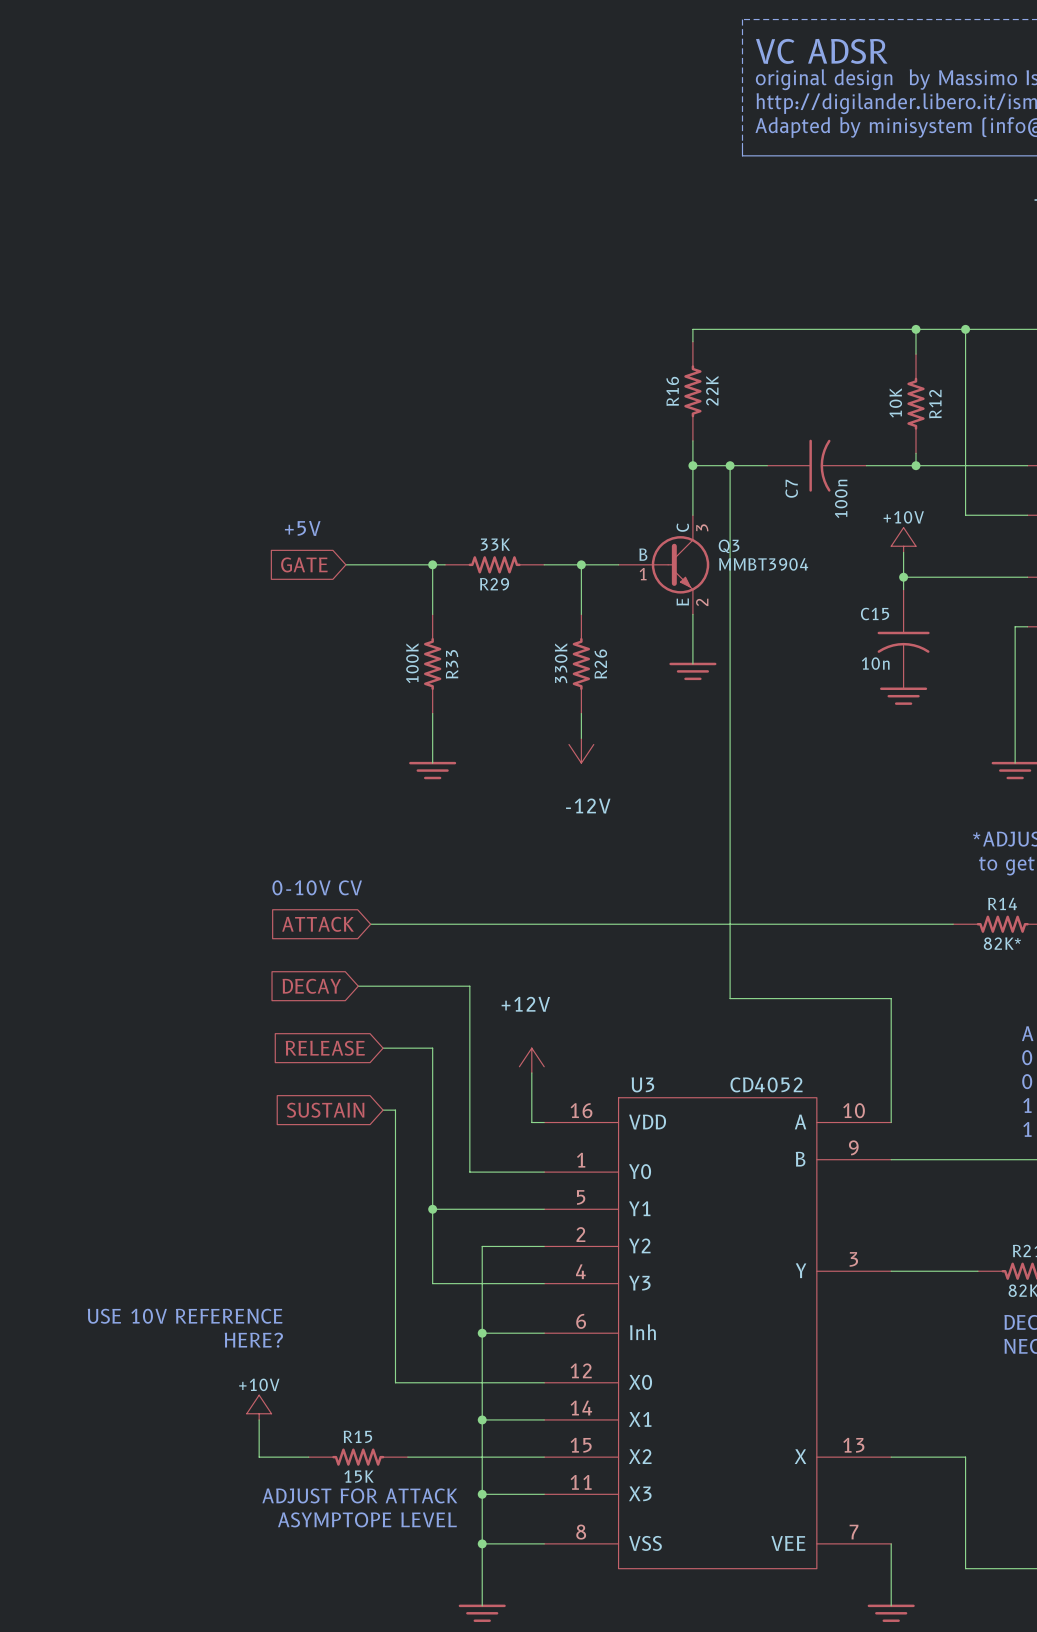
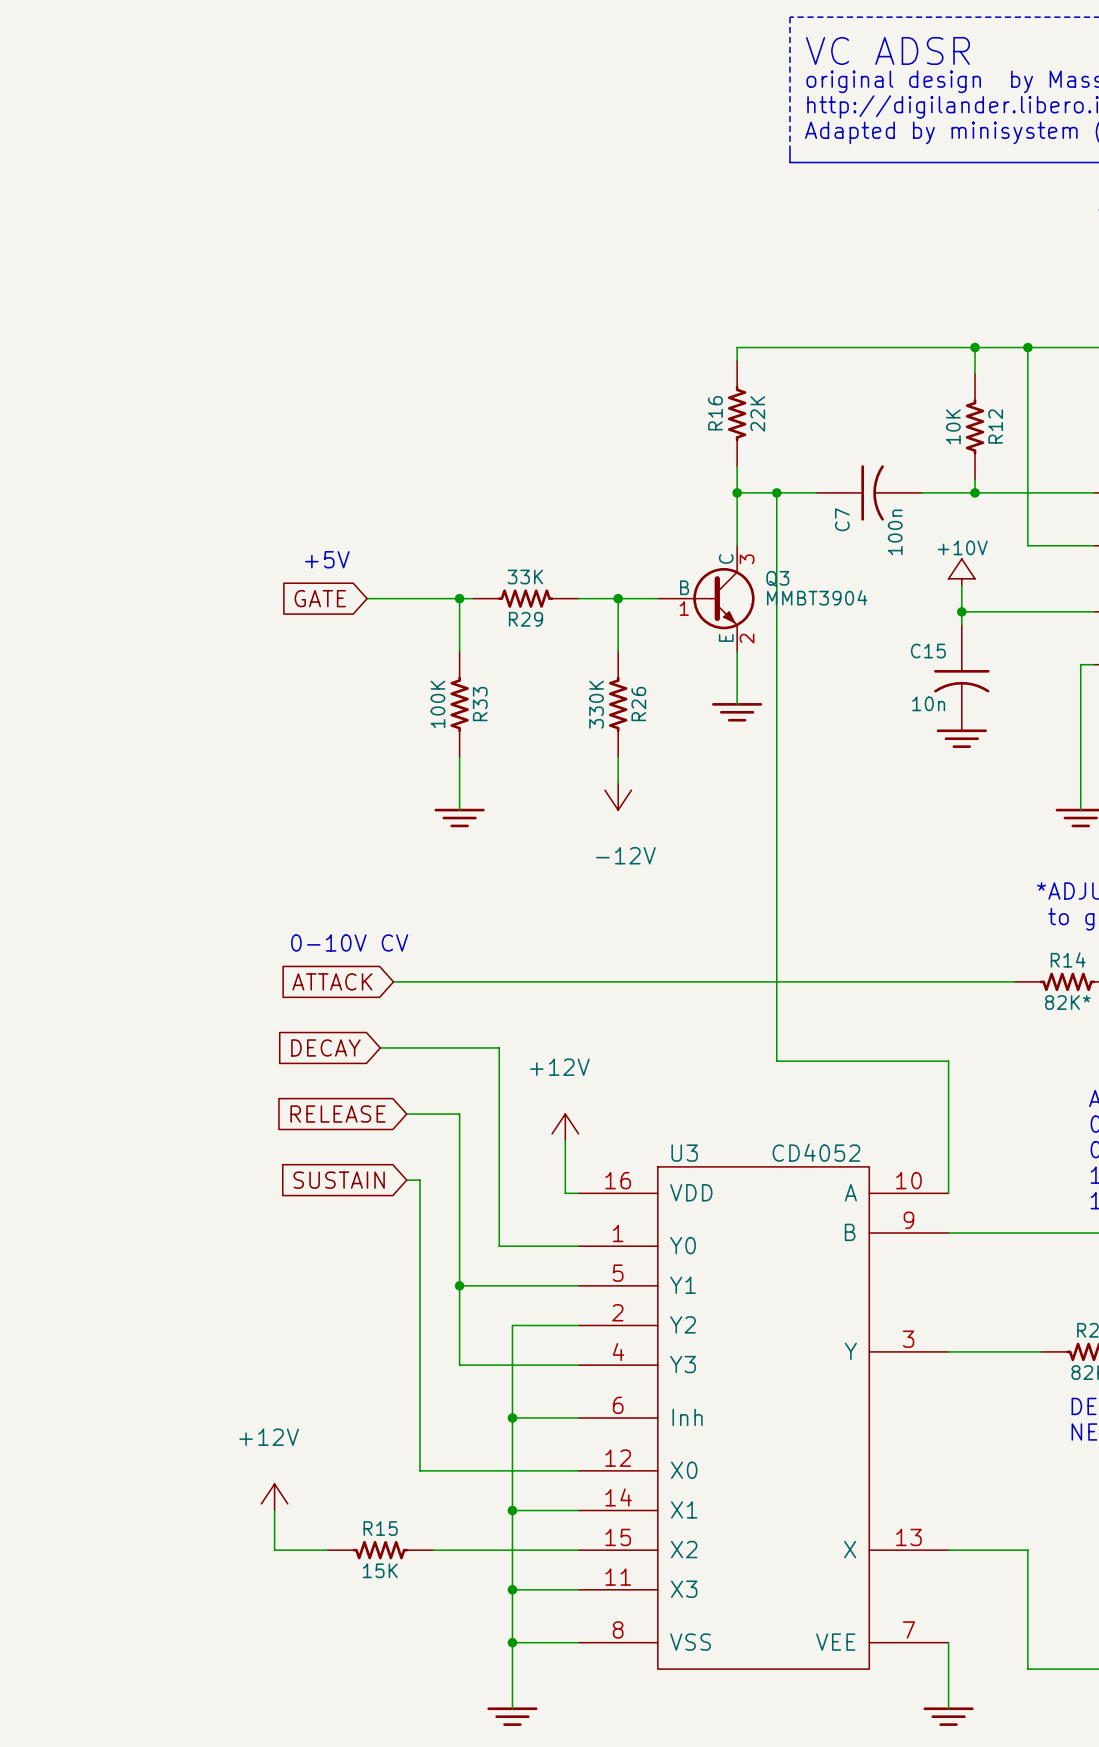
text: USE 10V REFERENCE (185, 1316) -> none
text: HERE? (253, 1340) -> none
power symbol: +10V (259, 1407) -> +12V (274, 1497)
text: ADJUST FOR ATTACK (359, 1495) -> none
text: ASYMPTOPE LEVEL (367, 1519) -> none

